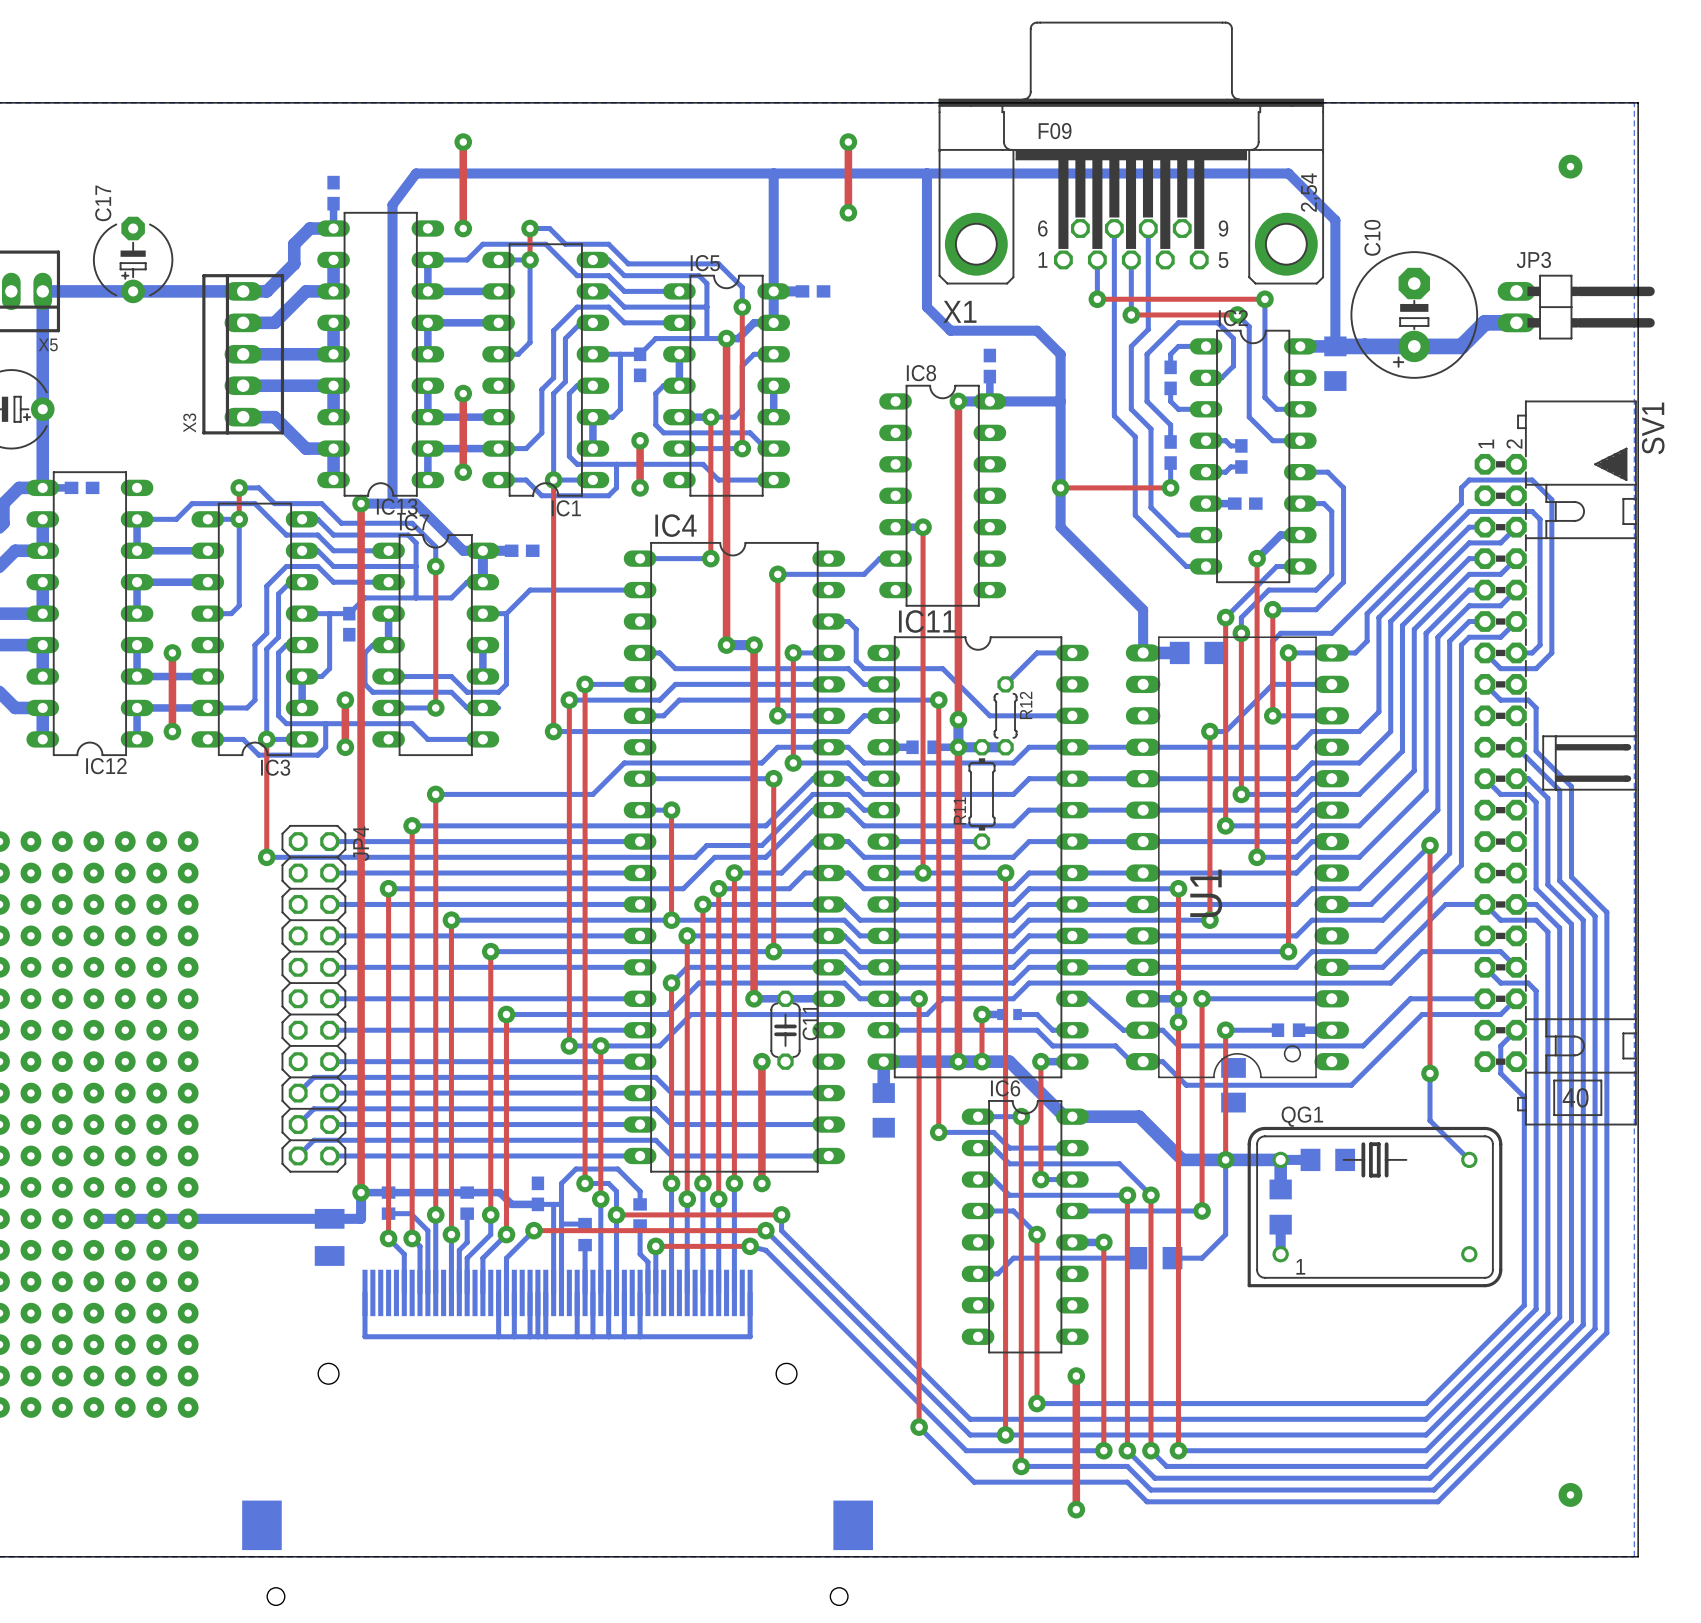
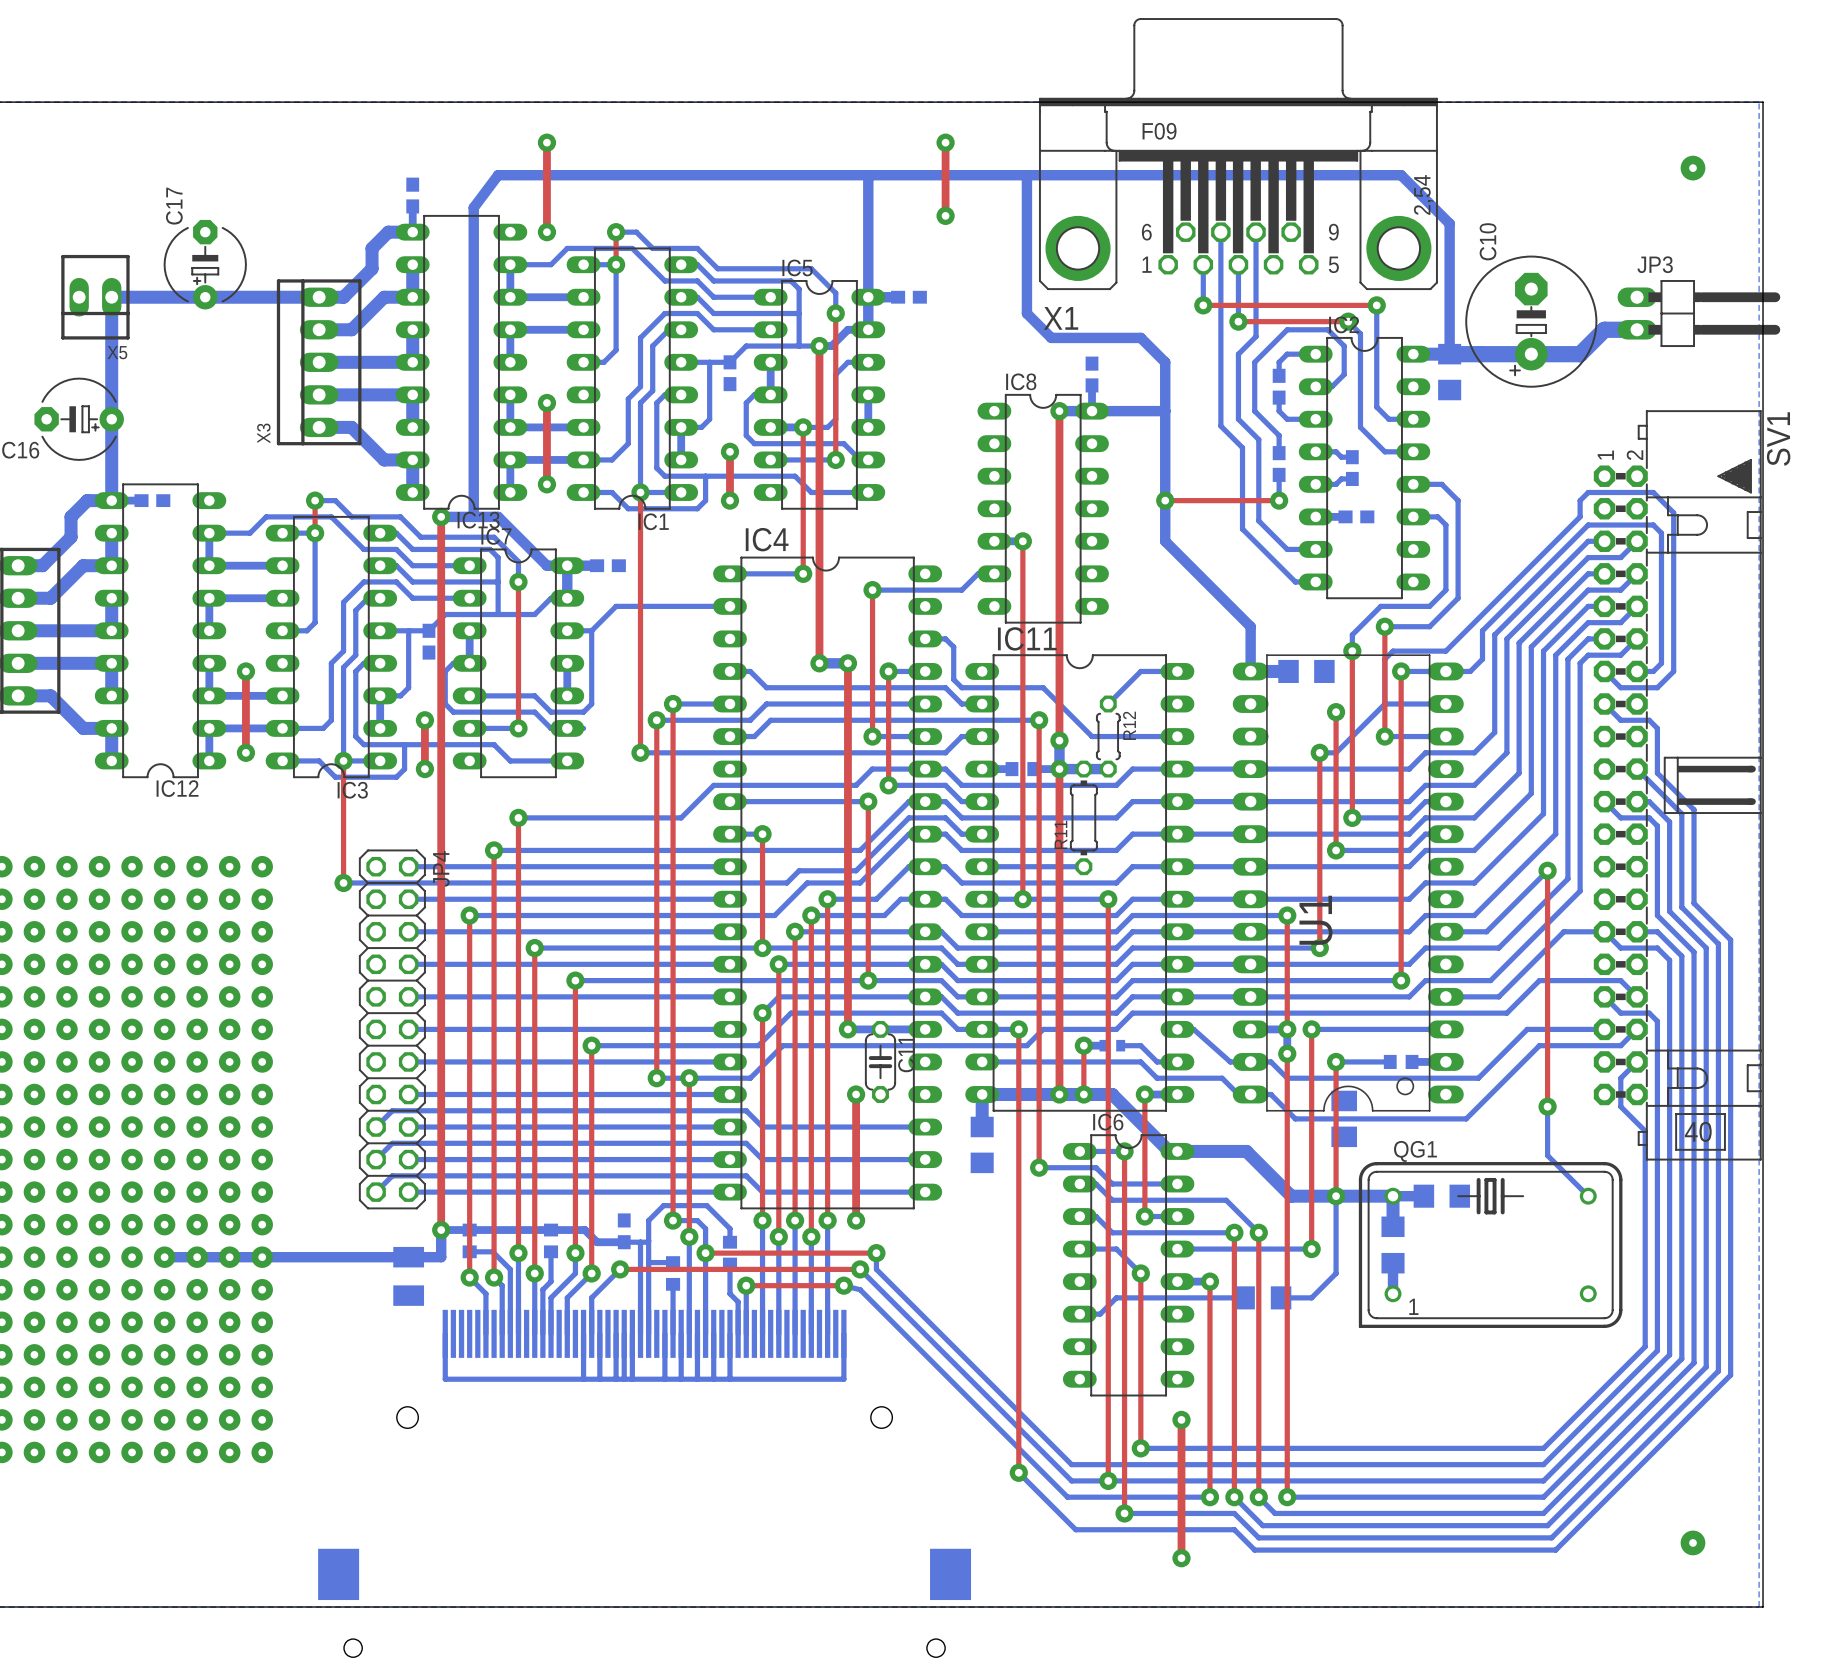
bottom track: (1300, 535) (1280, 535) (1257, 558) -> none
top track: (1257, 558) (1257, 857) -> none
via: (1257, 558) -> none
bottom track: (1300, 566) (1276, 566) (1225, 617) -> none
top track: (1225, 617) (1225, 692) -> none
via: (1225, 617) -> none
via: none -> (1336, 712)
bottom track: (1331, 841) (1312, 841) (1296, 857) (1257, 857) -> none
via: (1257, 857) -> none

